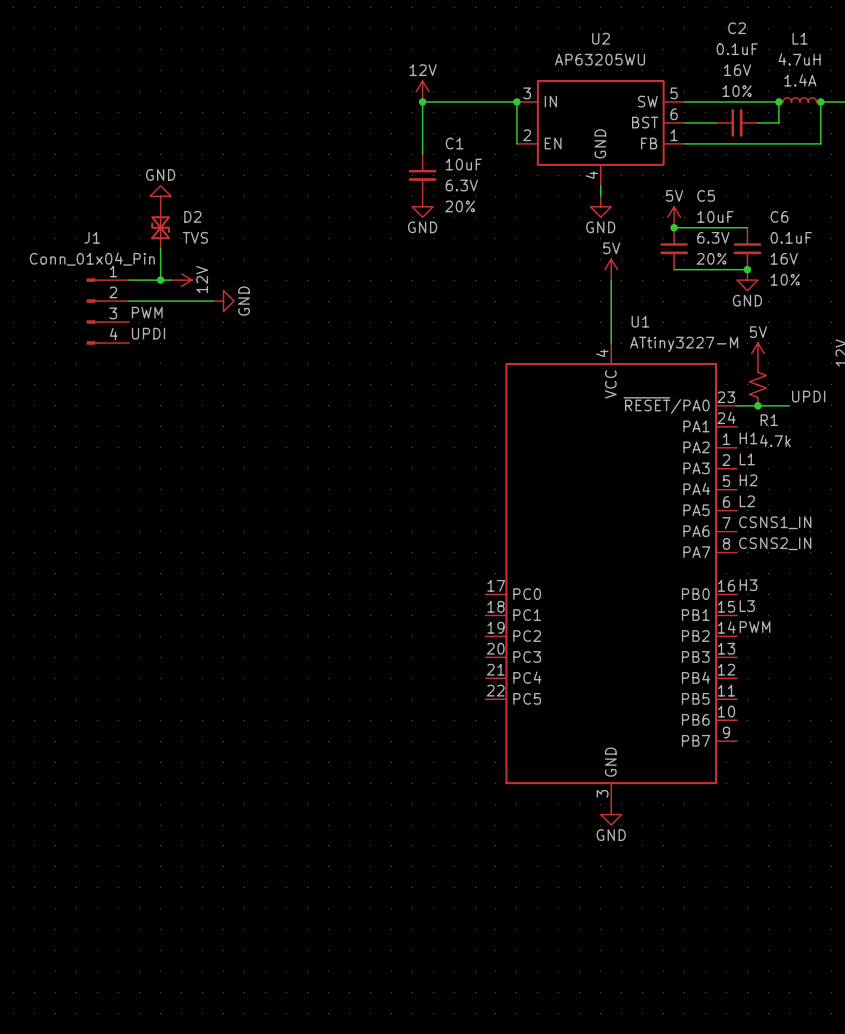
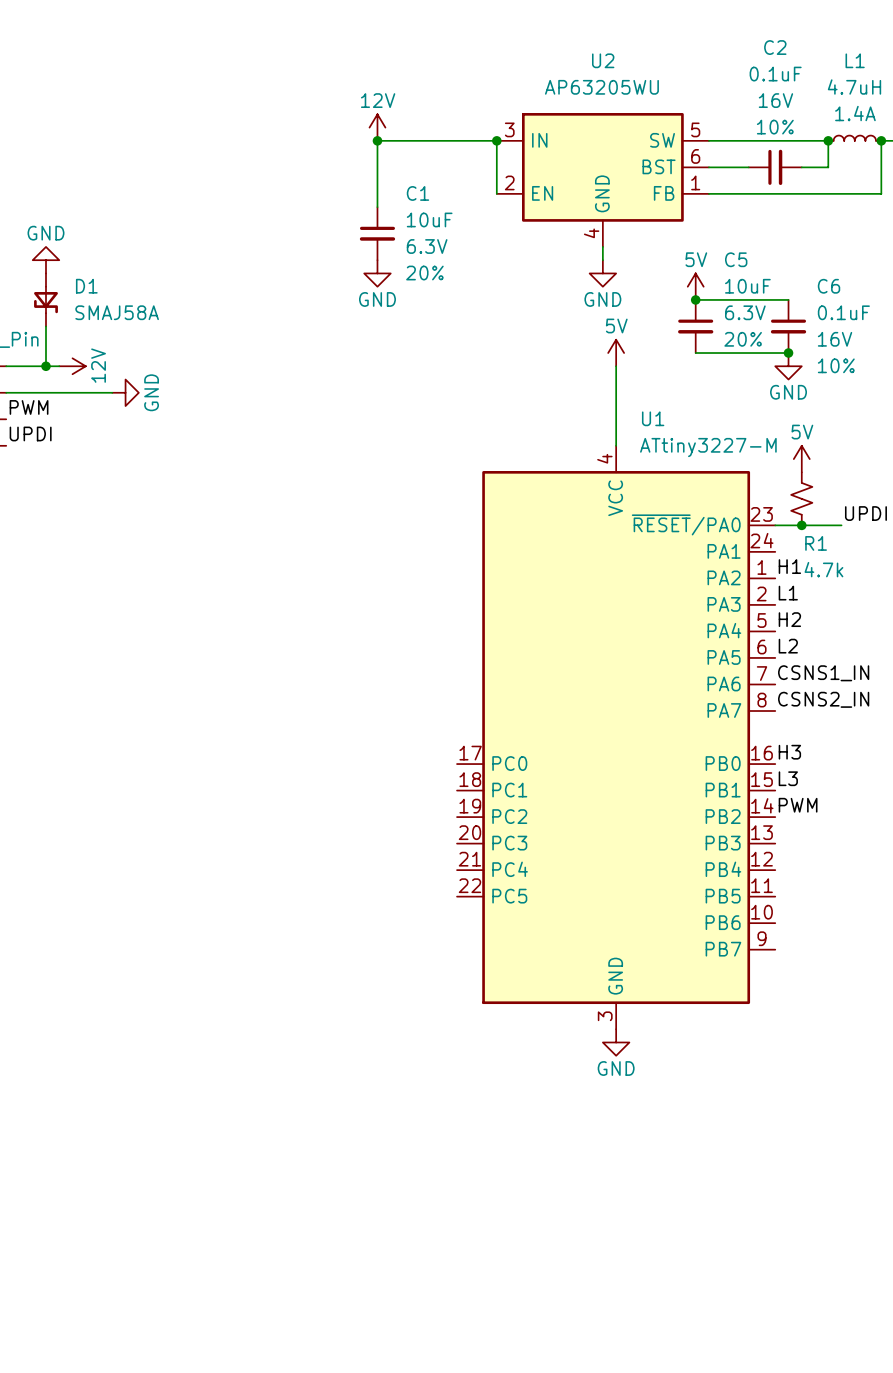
D2: TVS (160, 227) -> none
D1: none -> SMAJ58A (45, 299)

